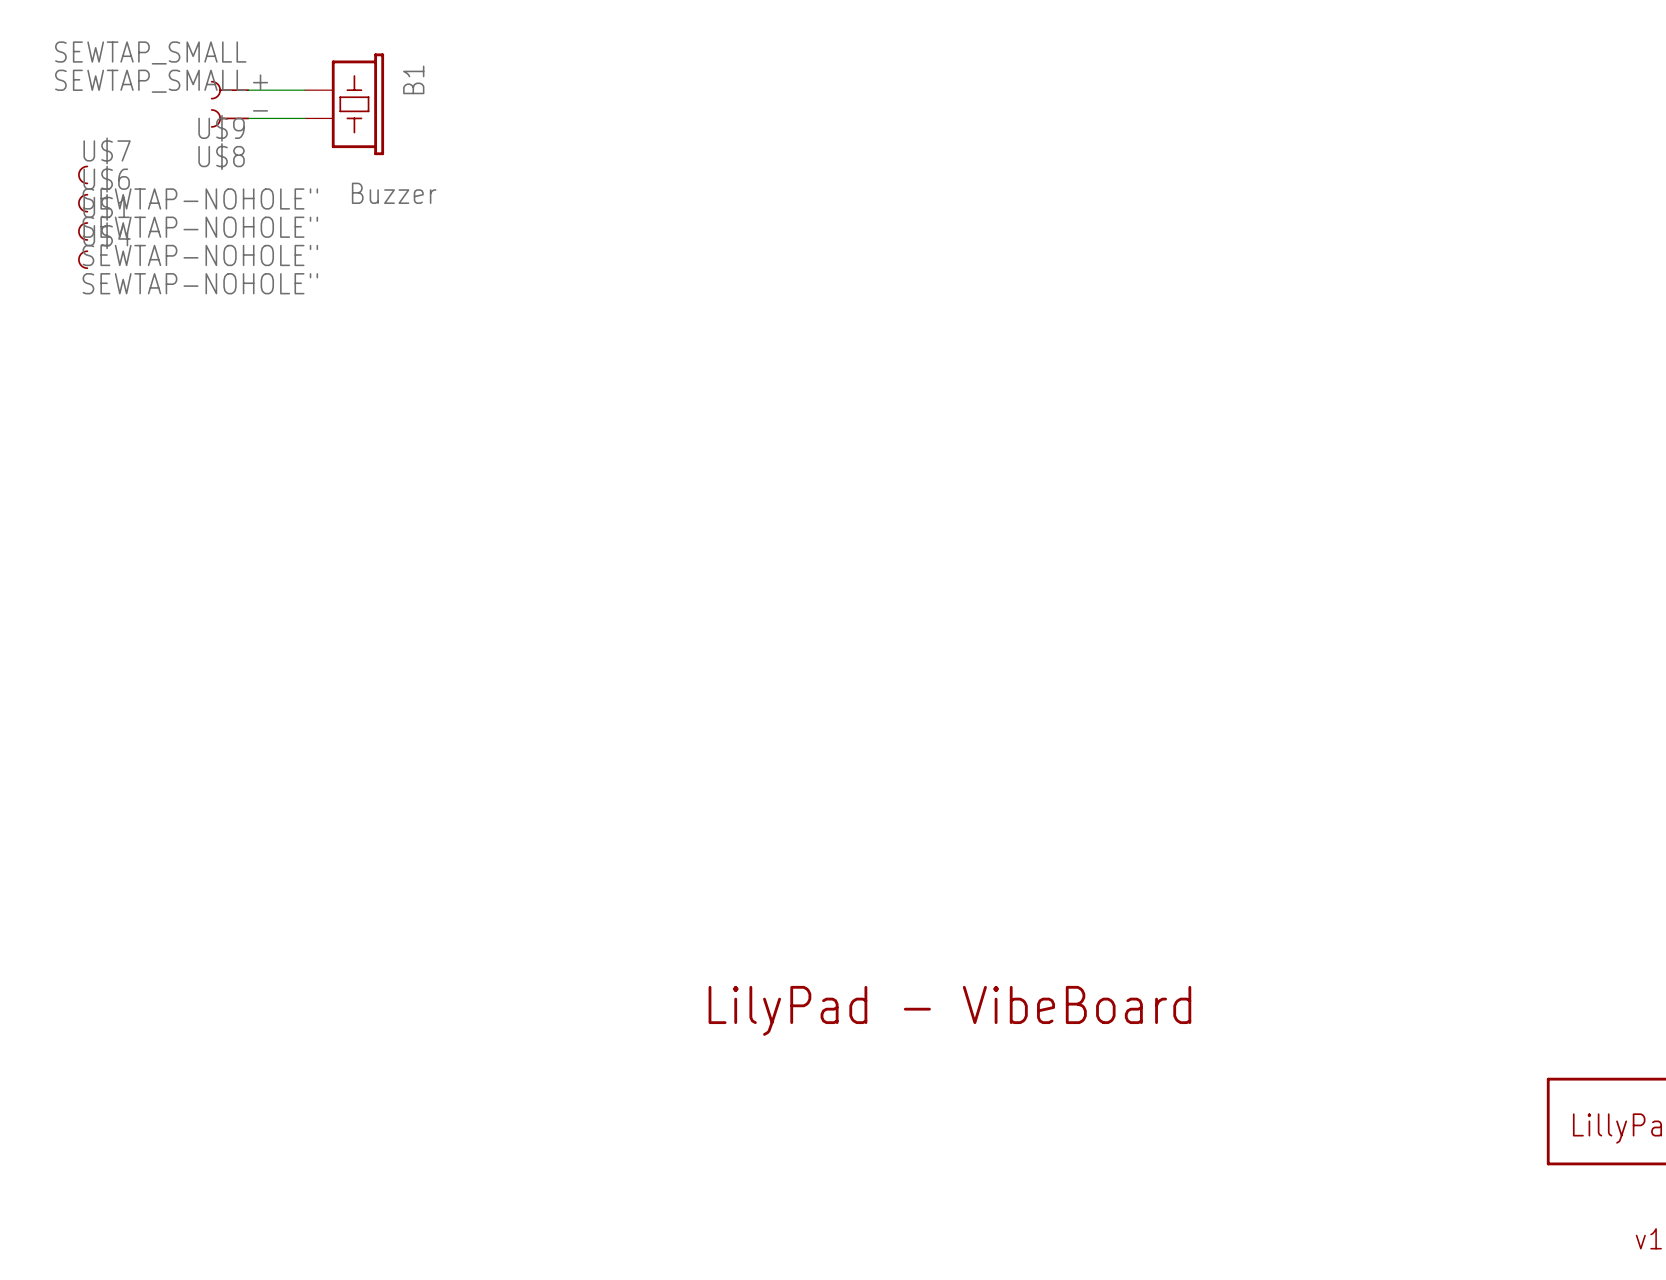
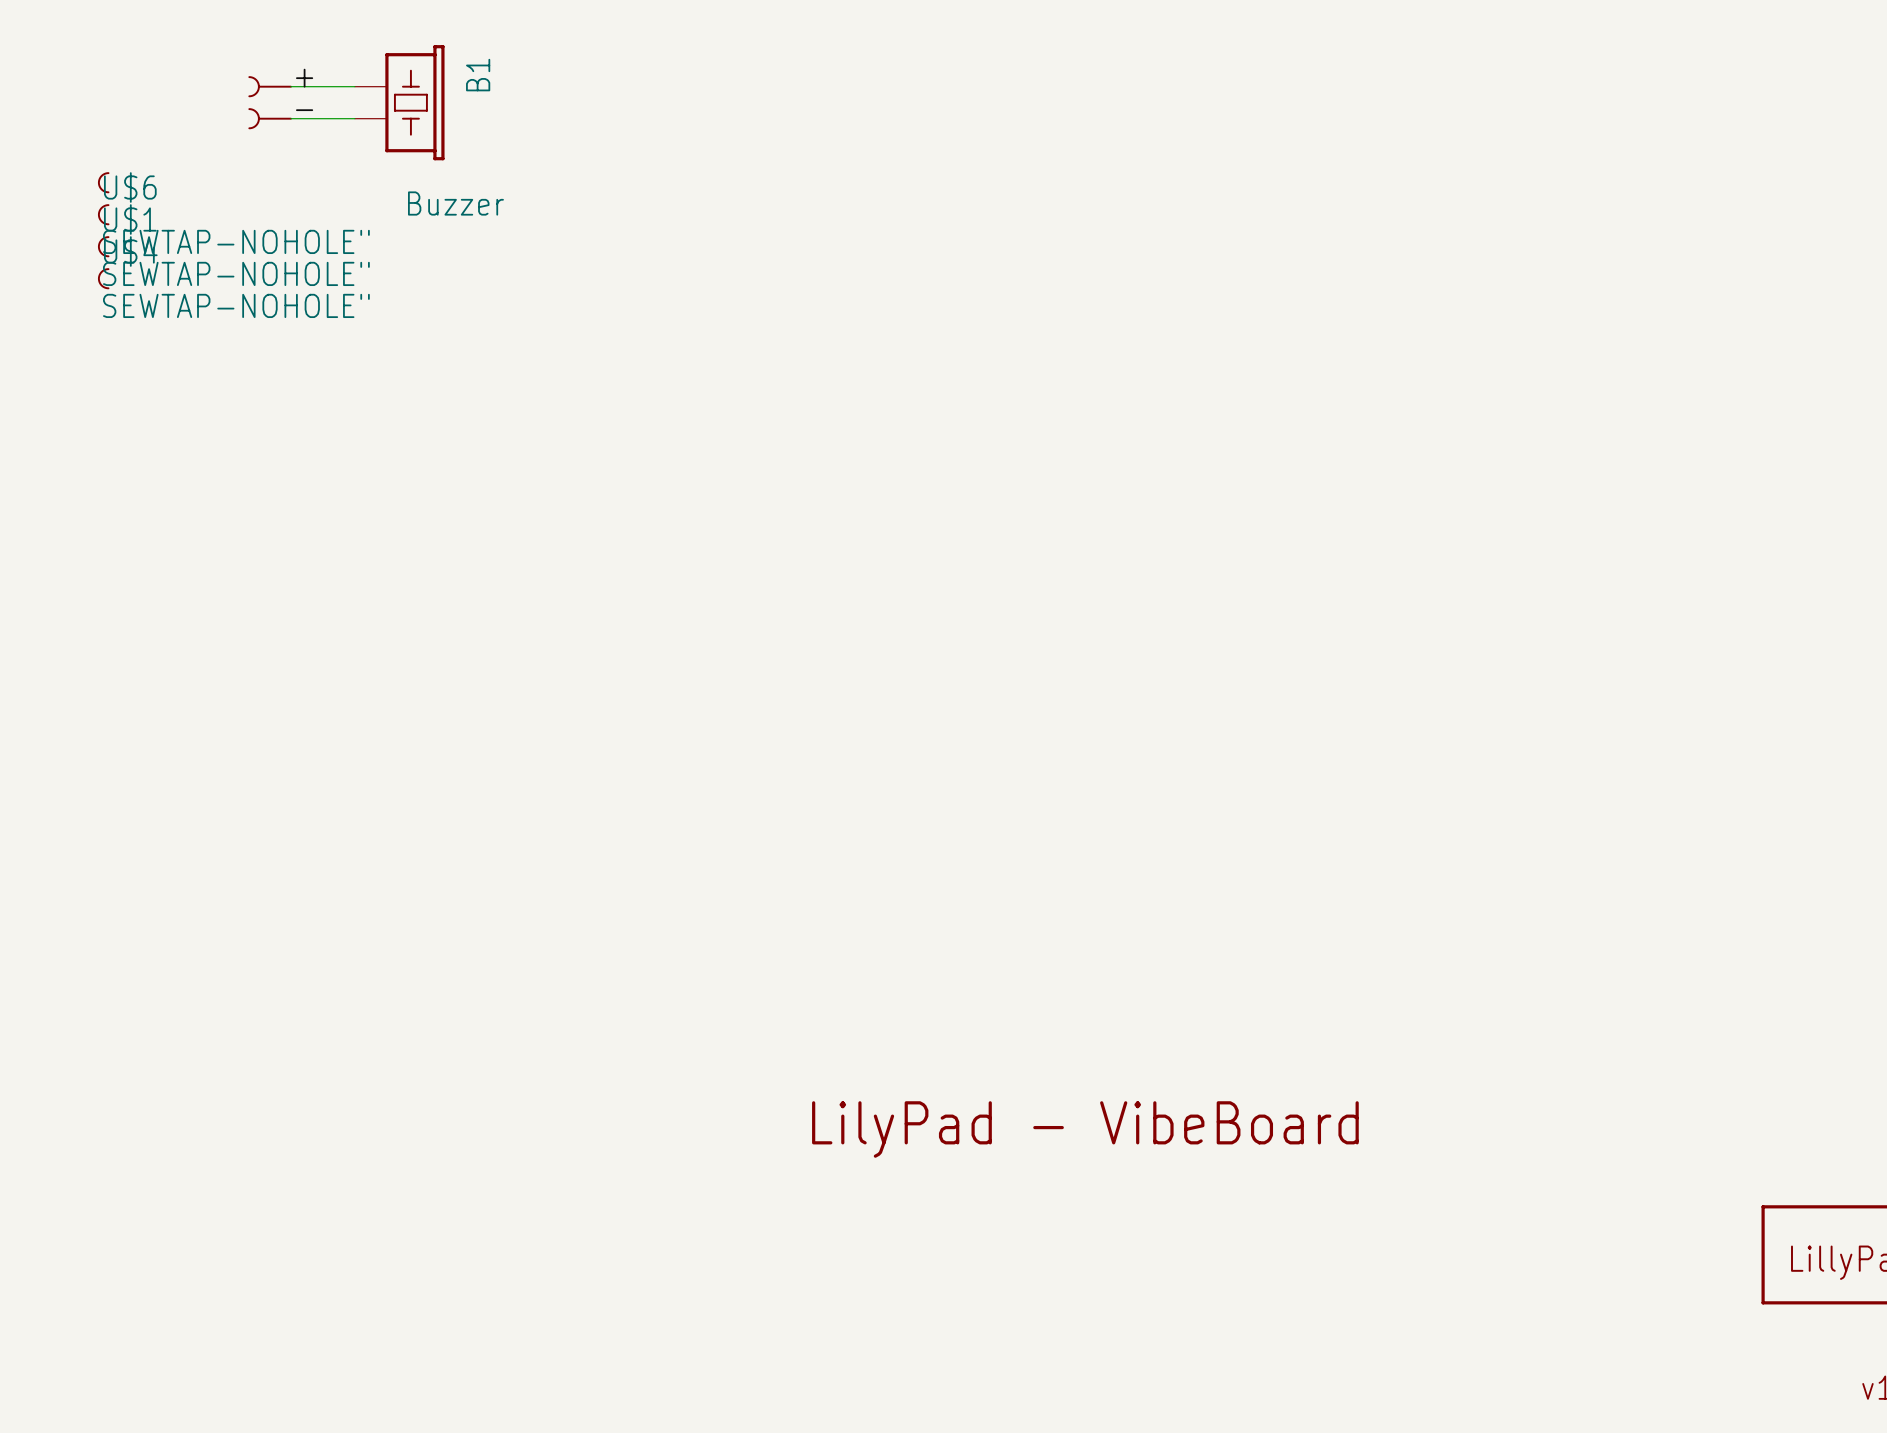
U$9 value: SEWTAP_SMALL (150, 52) -> none
U$8 value: SEWTAP_SMALL (150, 81) -> none
U$9 name: U$9 (221, 128) -> none
U$7 name: U$7 (107, 150) -> none
U$8 name: U$8 (221, 156) -> none
U$7 value: SEWTAP-NOHOLE" (200, 198) -> none

